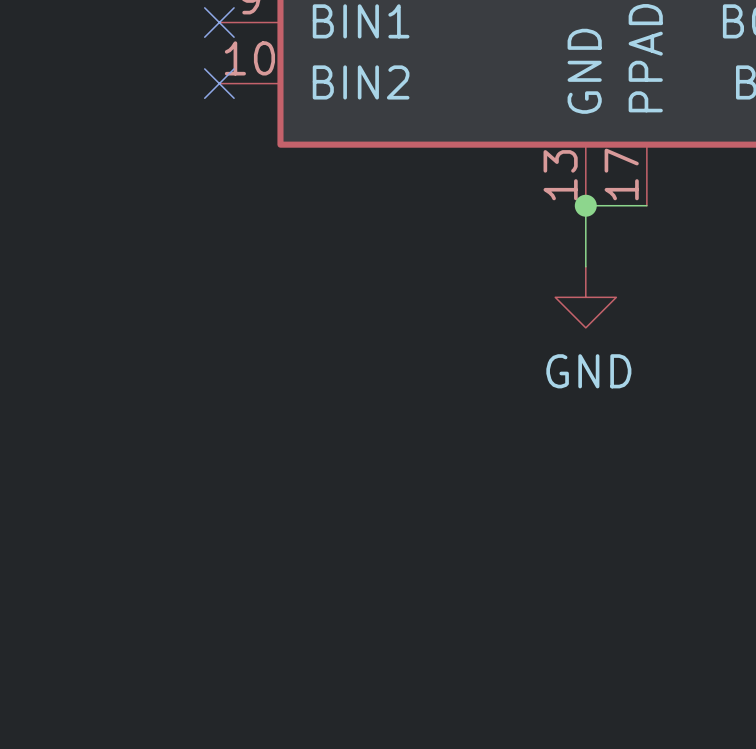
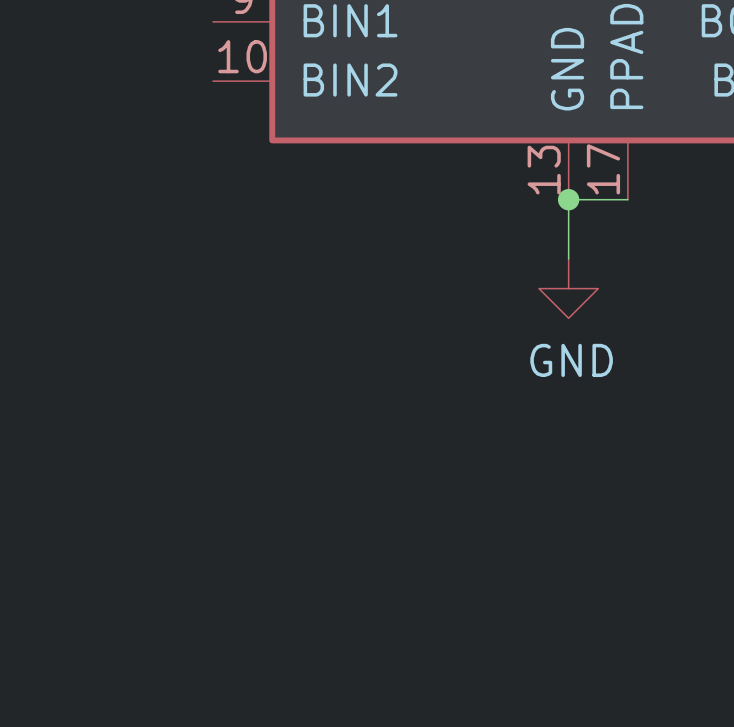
no-connect mark: (219, 22) -> none
no-connect mark: (219, 83) -> none

